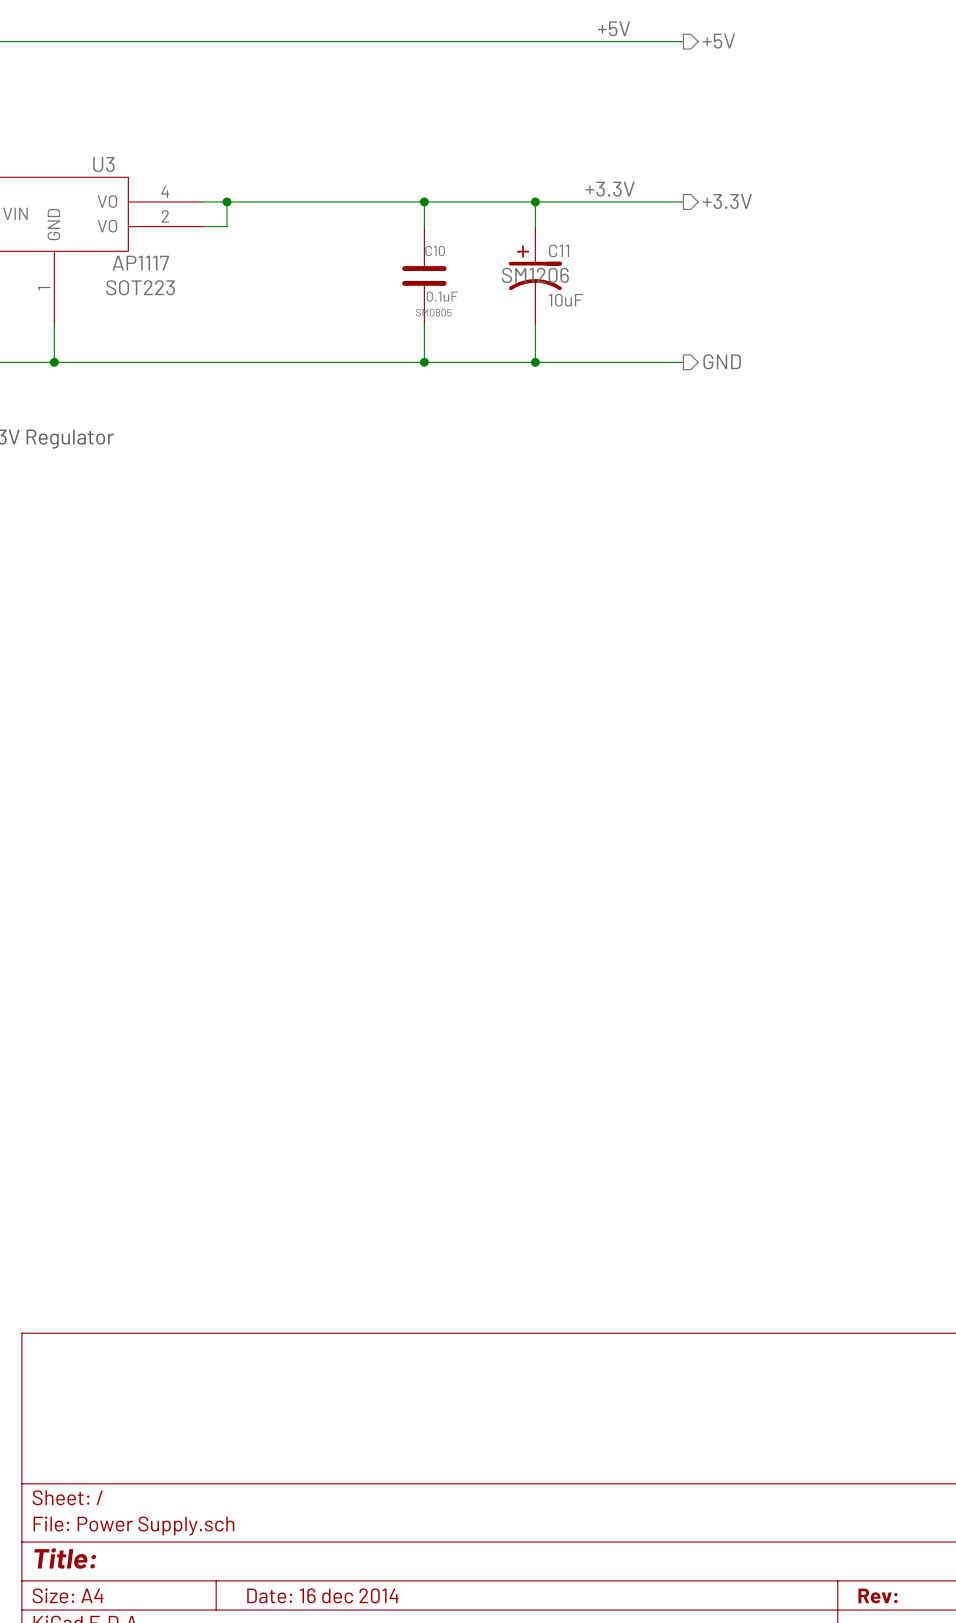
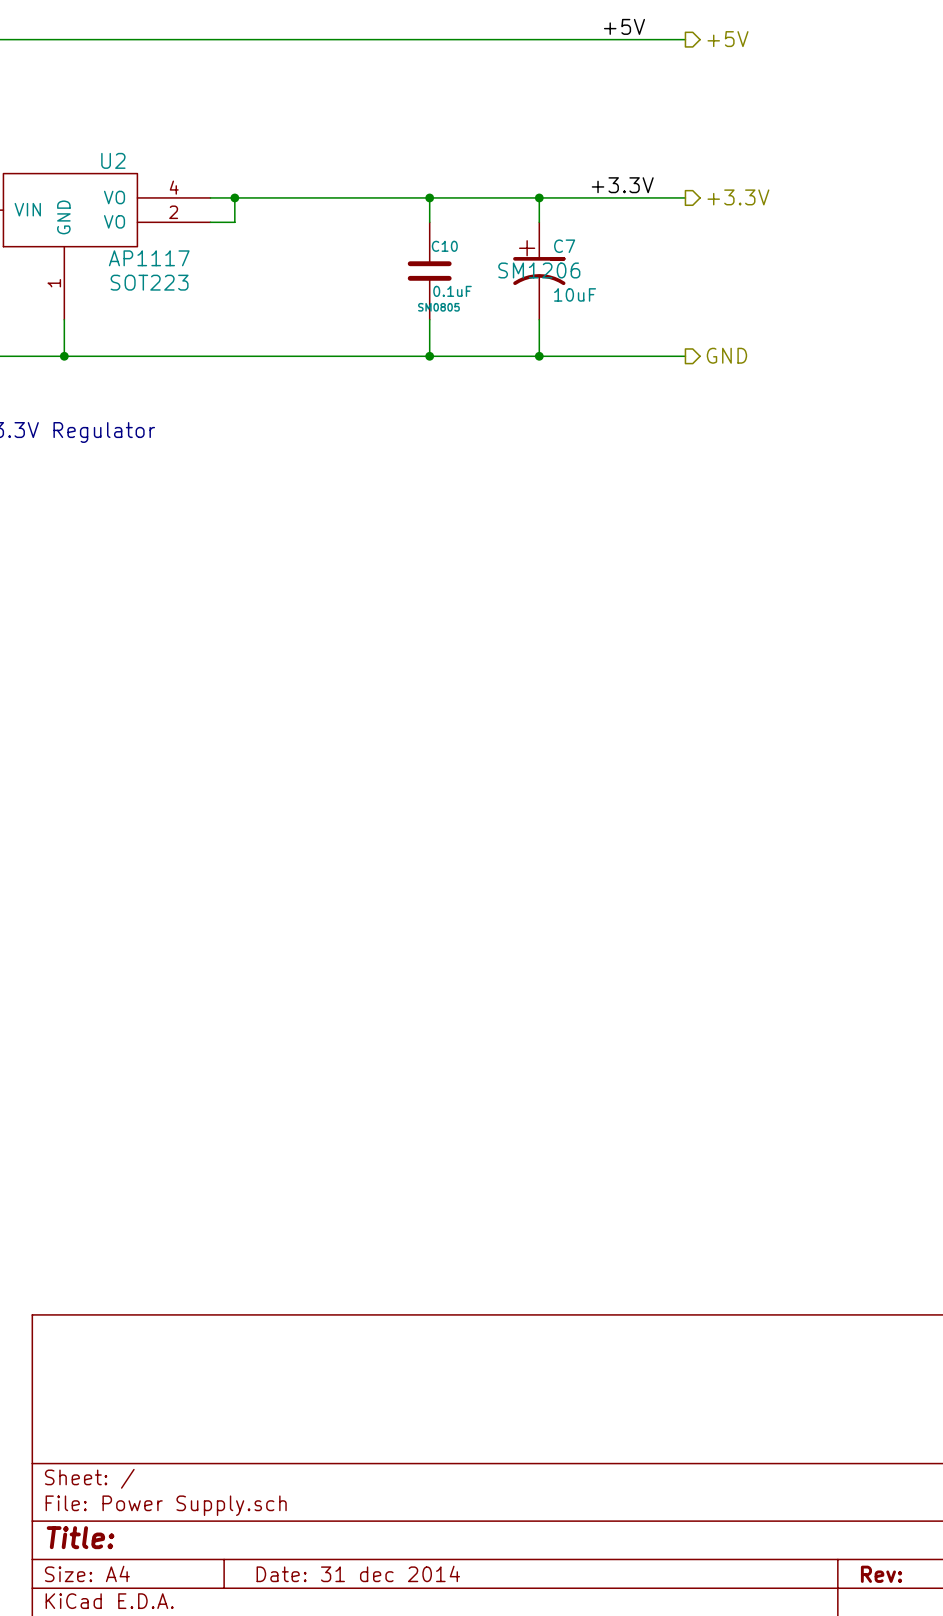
U3 name: U3 (103, 164) -> U2 (113, 160)
C11 name: C11 (559, 250) -> C7 (564, 246)
title block: Date: 16 dec 2014 (322, 1595) -> Date: 31 dec 2014 (358, 1573)

